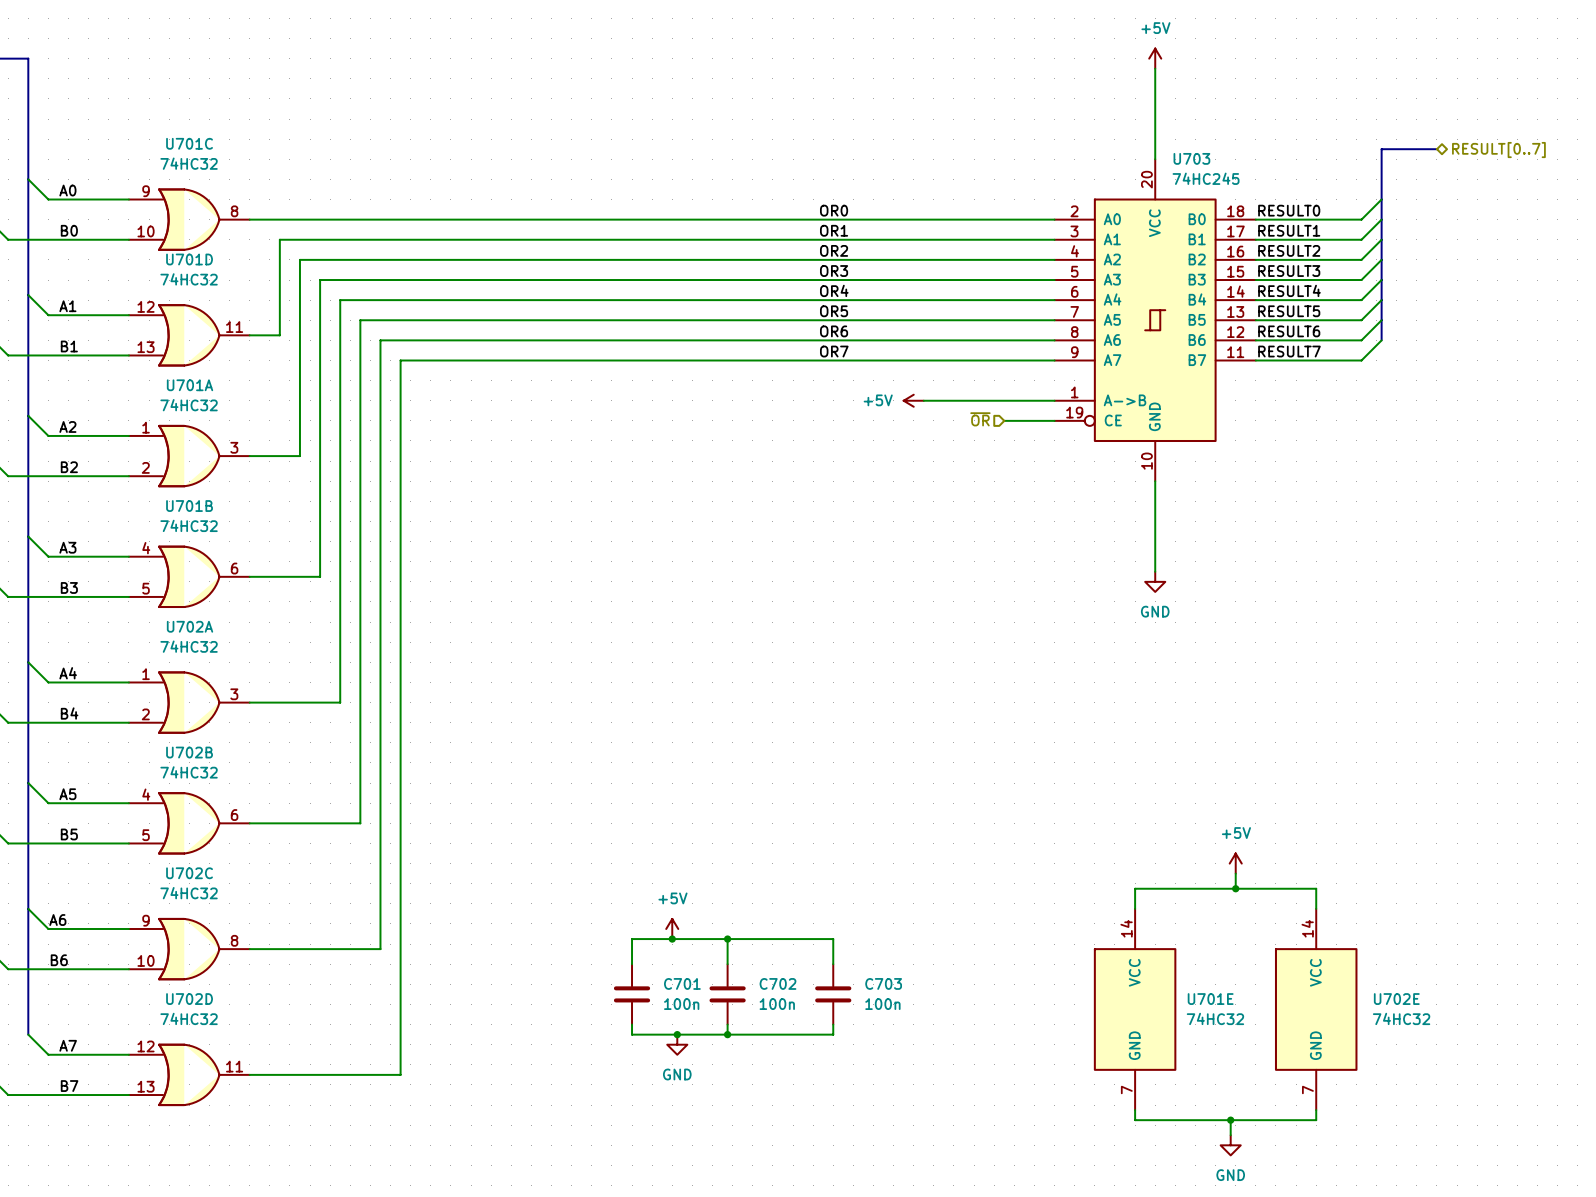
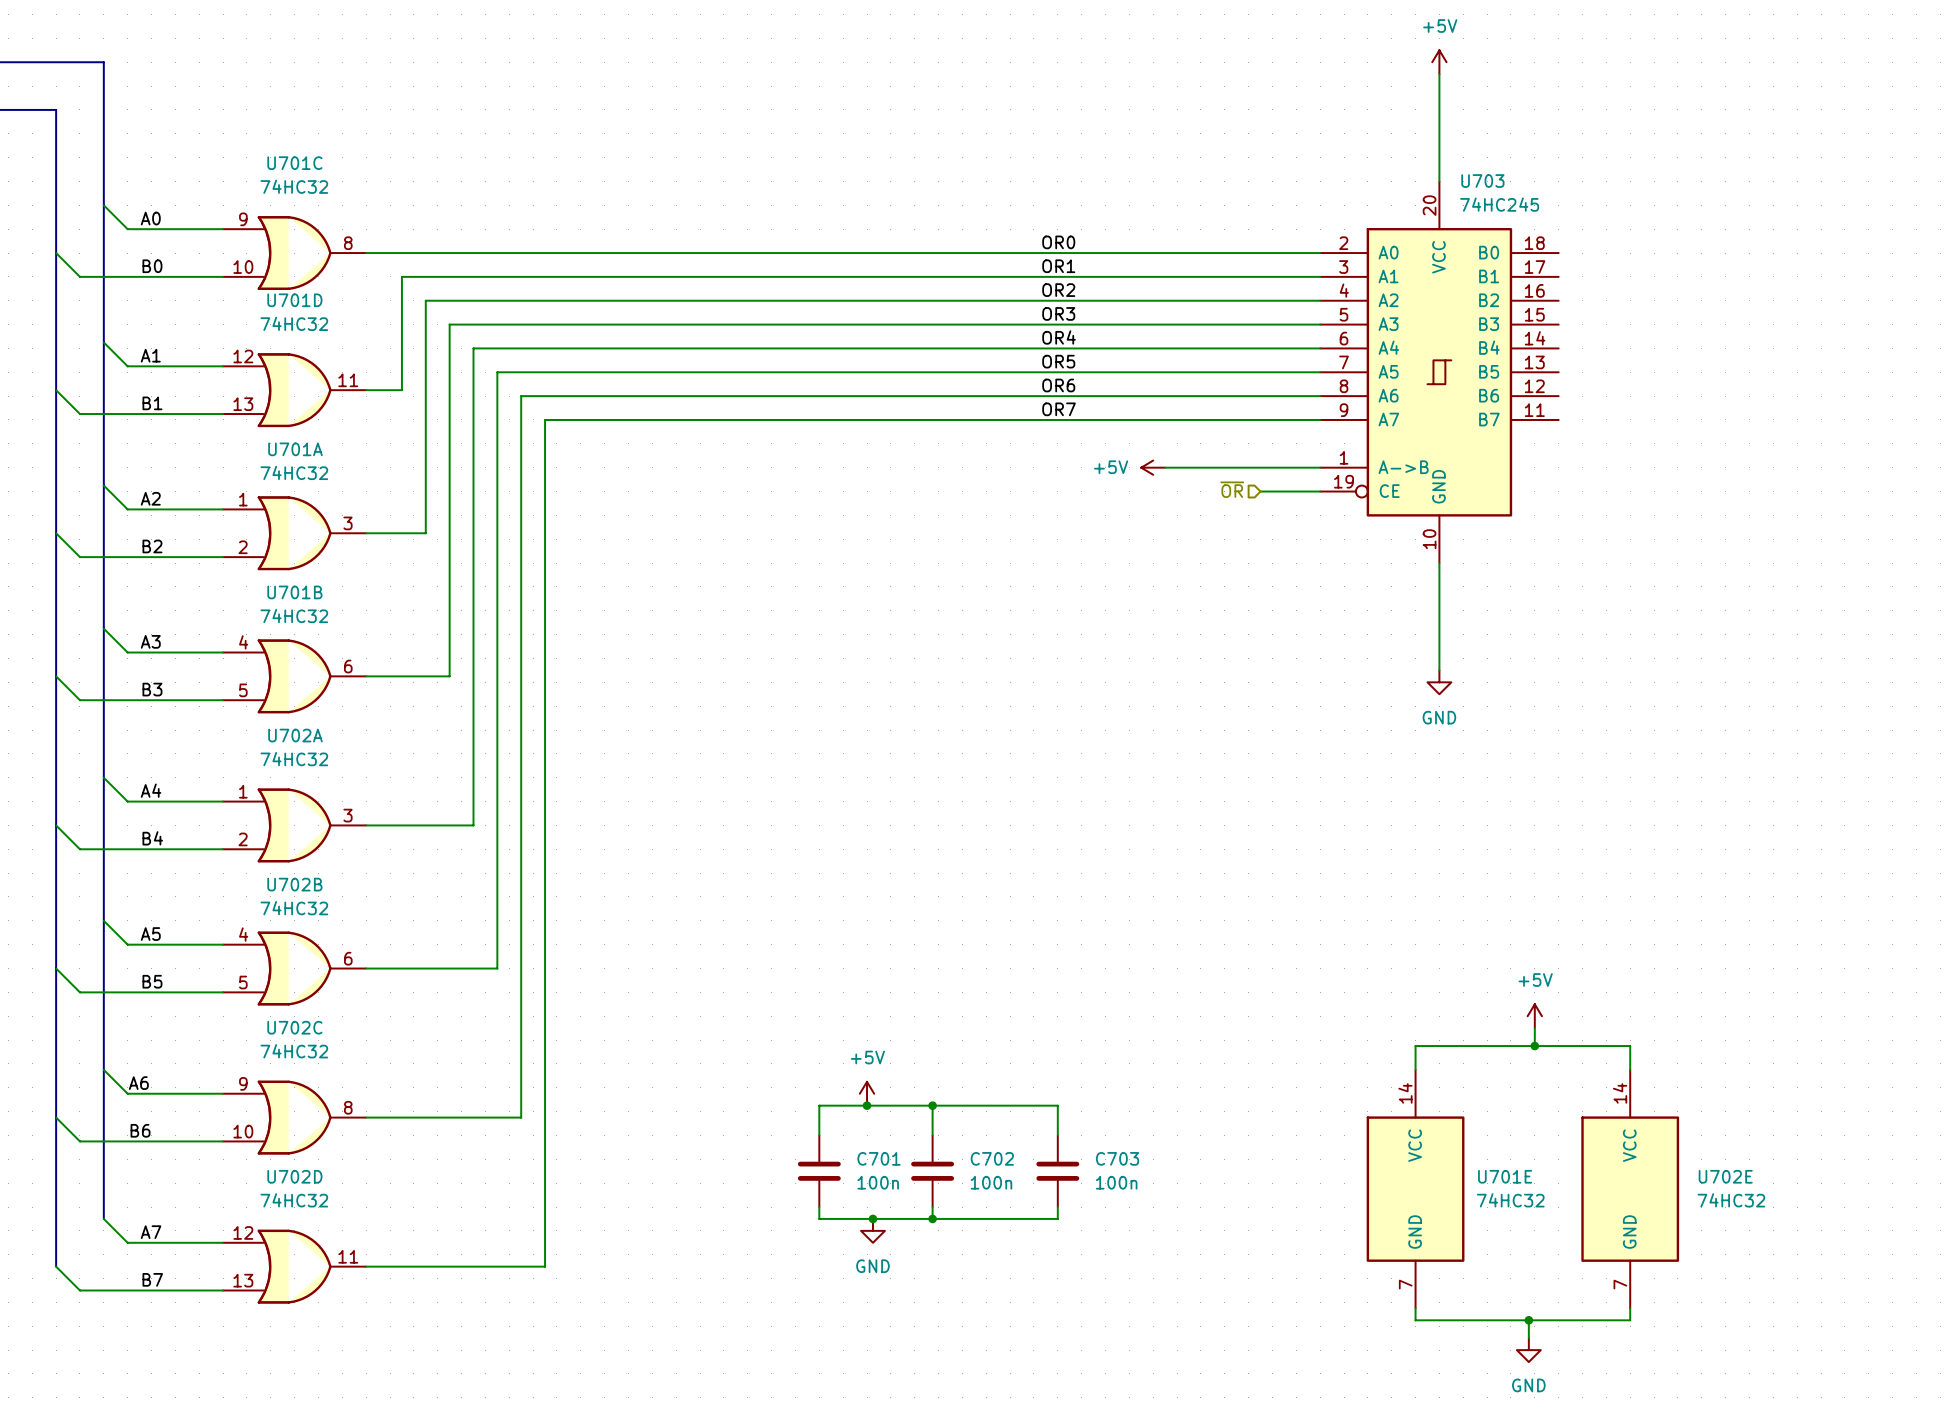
bus: (1436, 149) (1381, 149) (1381, 340) -> none
hierarchical label: RESULT[0..7] (1498, 150) -> none
wire: (1381, 199) (1361, 219) (1255, 219) -> none
label: RESULT0 (1289, 210) -> none
wire: (1381, 219) (1361, 239) (1255, 239) -> none
label: RESULT1 (1289, 230) -> none
wire: (1381, 239) (1361, 259) (1255, 259) -> none
label: RESULT2 (1289, 250) -> none
wire: (1381, 259) (1361, 280) (1255, 280) -> none
label: RESULT3 (1289, 271) -> none
wire: (1381, 280) (1361, 300) (1255, 300) -> none
label: RESULT4 (1289, 290) -> none
wire: (1381, 300) (1361, 320) (1255, 320) -> none
label: RESULT5 (1289, 311) -> none
wire: (1381, 320) (1361, 340) (1255, 340) -> none
label: RESULT6 (1289, 331) -> none
wire: (1381, 340) (1361, 360) (1255, 360) -> none
label: RESULT7 (1289, 351) -> none

